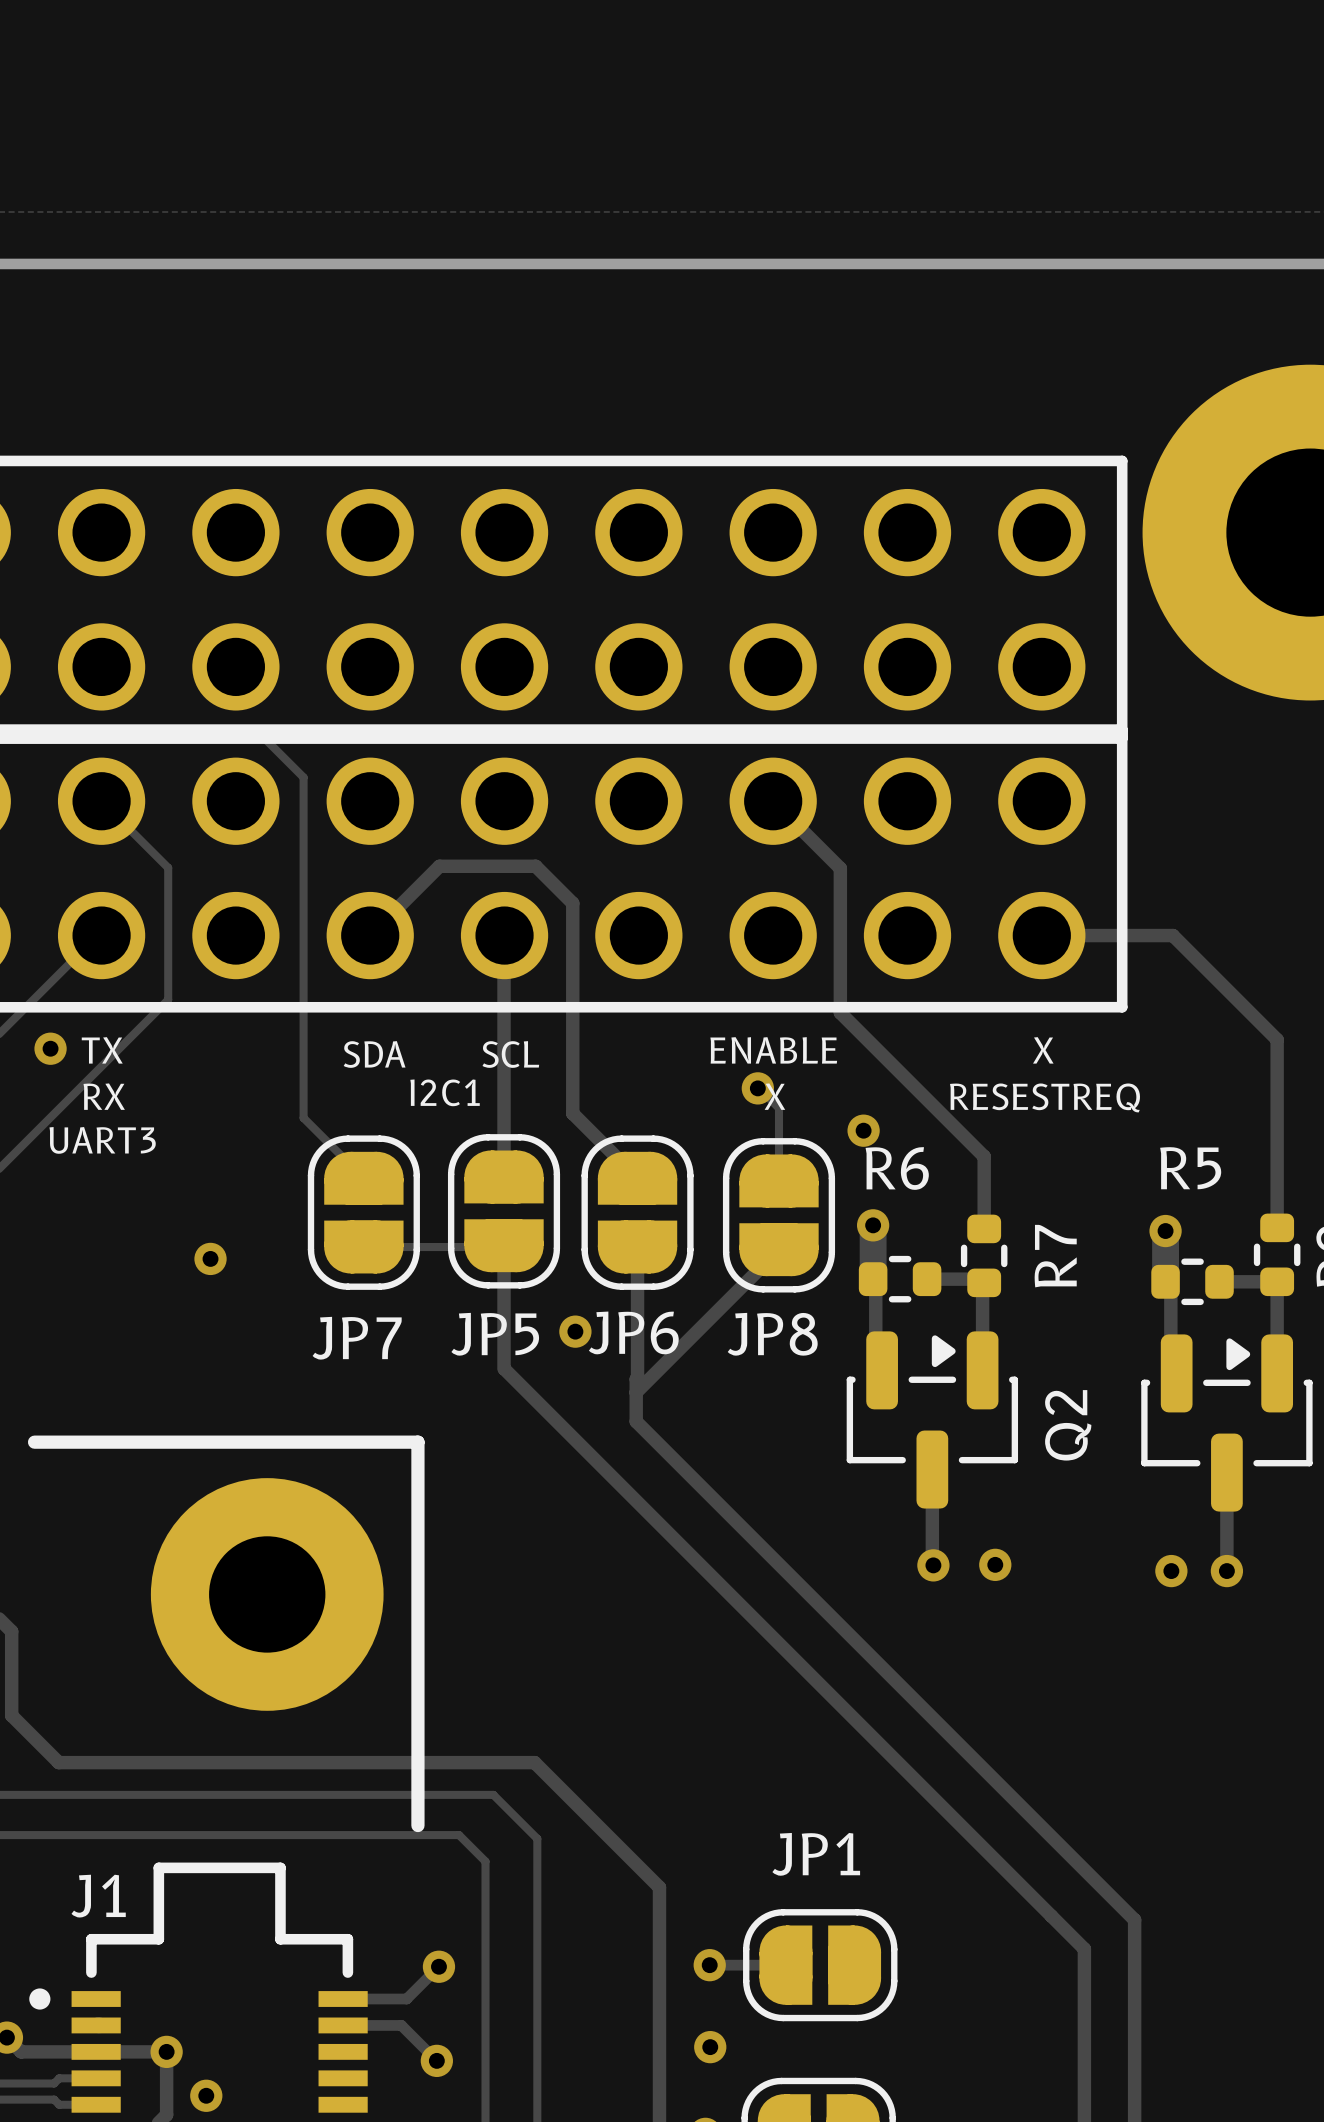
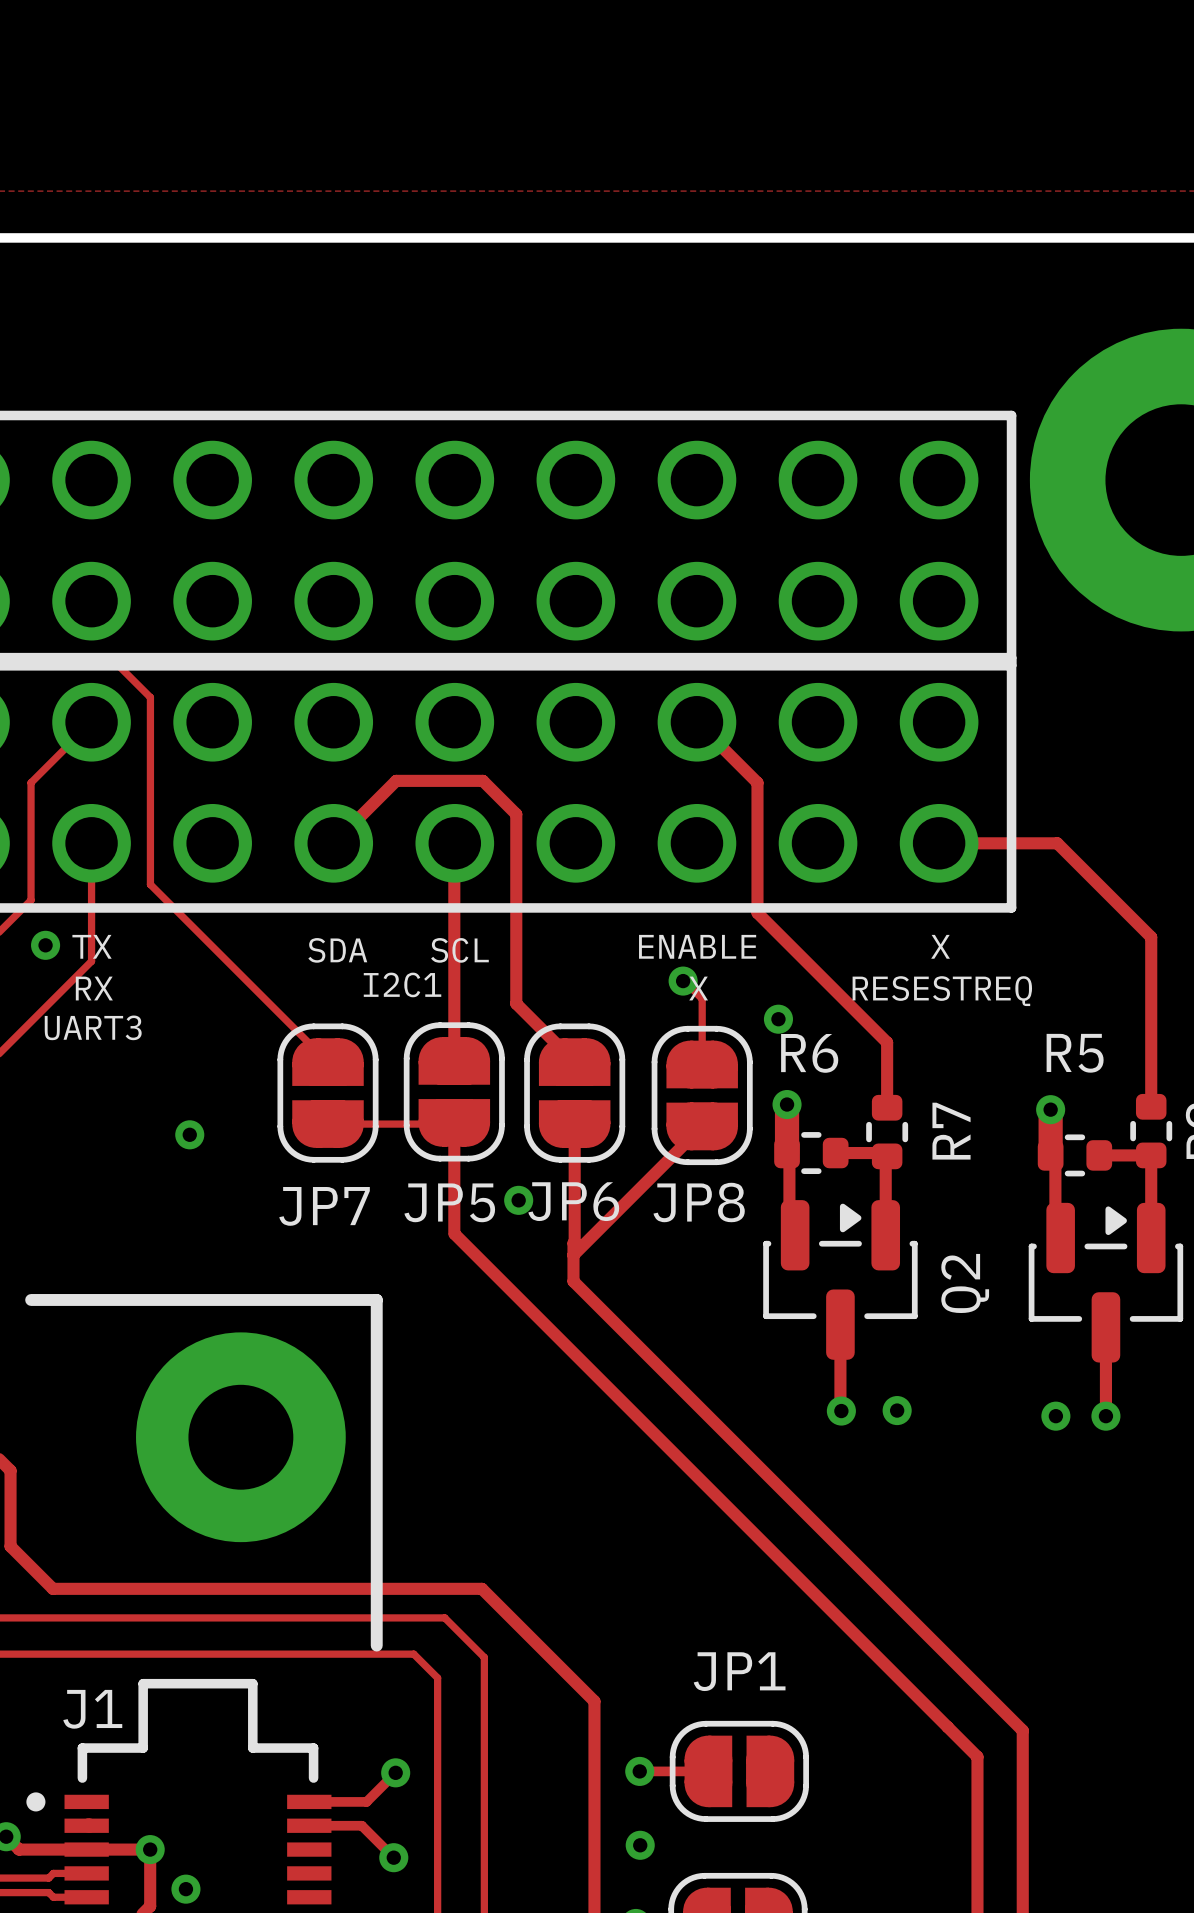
track: (124, 731) (257, 731) (303, 777) (303, 1118) -> (112, 659) (150, 697) (150, 884) (273, 1007)
track: (101, 801) (168, 867) (168, 999) (101, 1066) -> (91, 722) (31, 782) (31, 900)
track: (101, 935) (97, 935) (34, 998) -> (91, 843) (91, 961)

